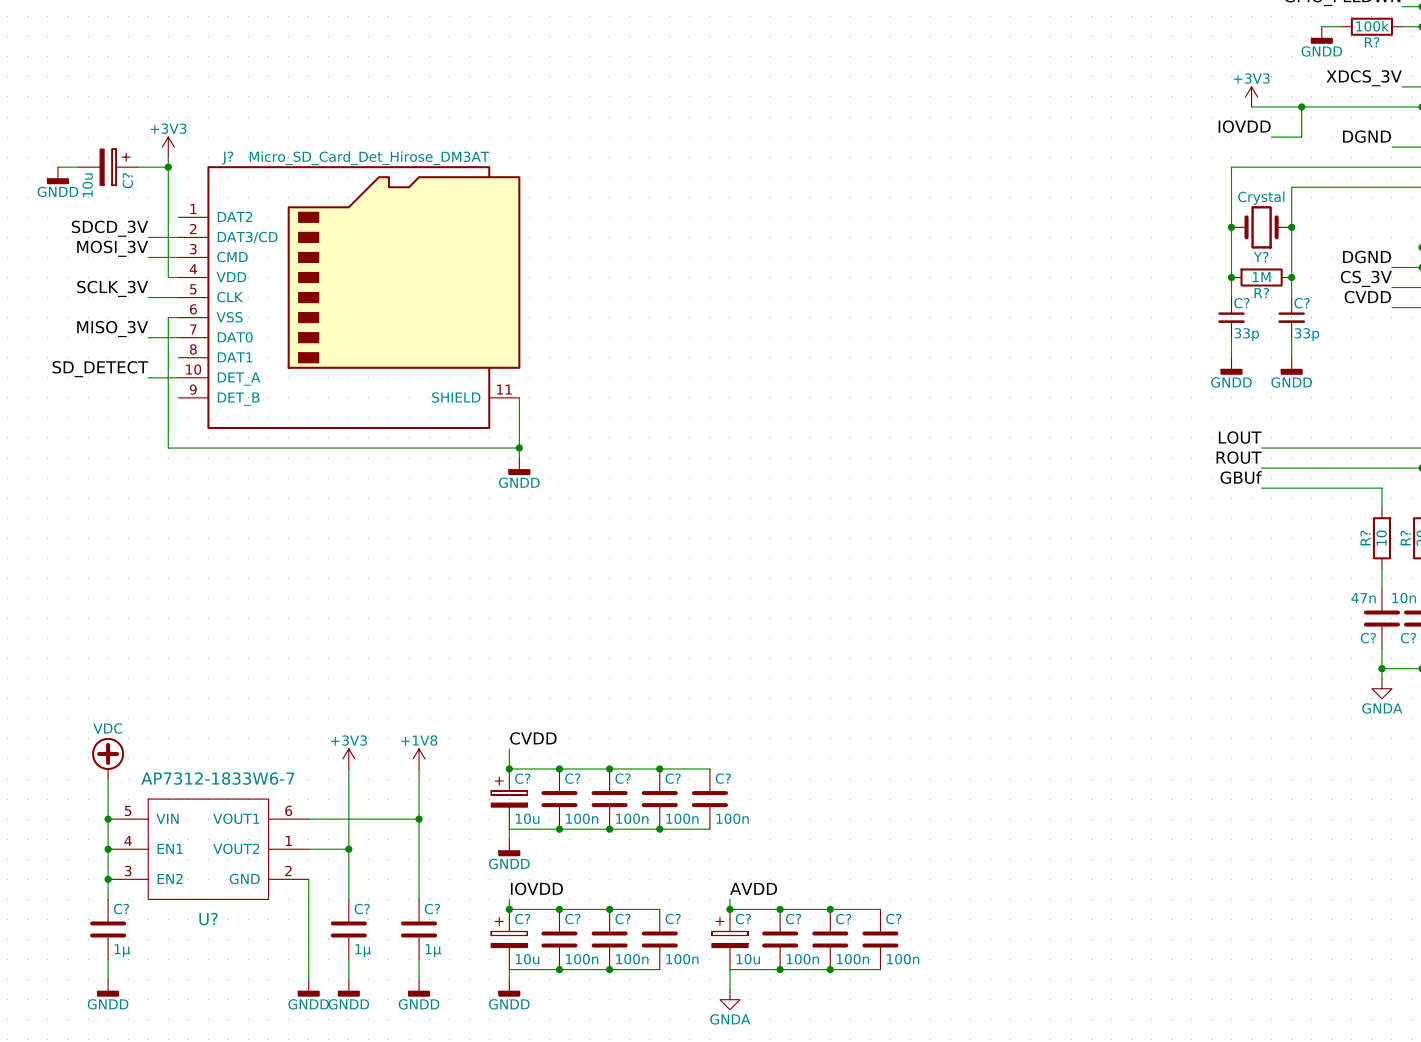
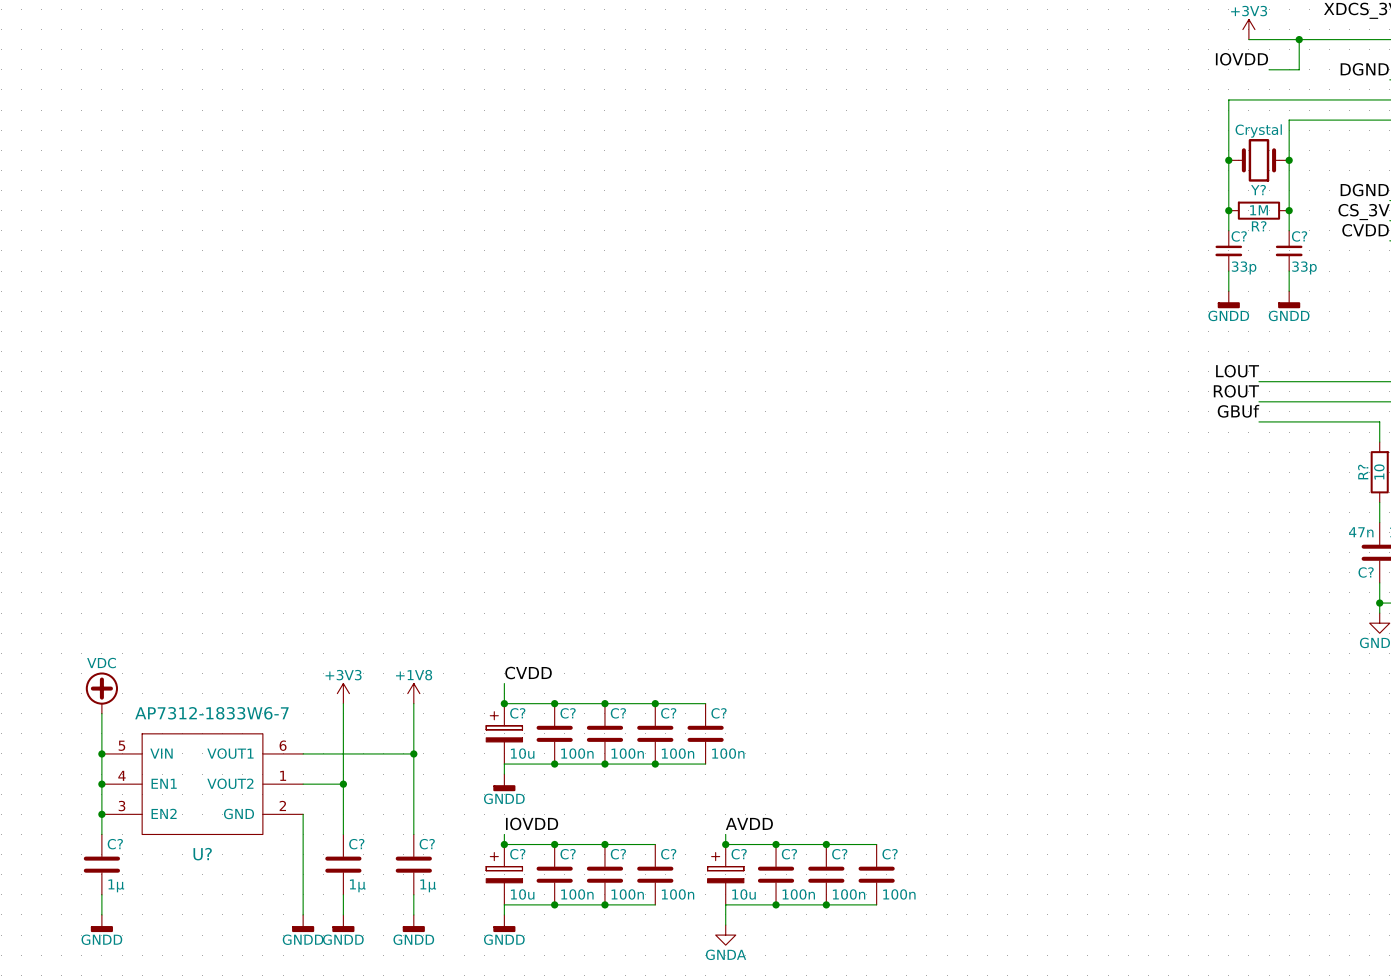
power symbol: +3V3 (168, 147) -> none
wire: (168, 157) (168, 277) (178, 277) -> none
wire: (57, 167) (78, 167) -> none
C?: 10u (108, 167) -> none
wire: (138, 167) (168, 167) -> none
junction: (168, 167) -> none
power symbol: GNDD (57, 175) -> none
label: SDCD_3V (109, 228) -> none
wire: (148, 237) (178, 237) -> none
label: MOSI_3V (112, 248) -> none
wire: (148, 257) (178, 257) -> none
label: SCLK_3V (112, 288) -> none
wire: (148, 297) (178, 297) -> none
J?: Micro_SD_Card_Det_Hirose_DM3AT (349, 297) -> none
wire: (178, 317) (168, 317) (168, 448) (519, 448) -> none
label: MISO_3V (112, 329) -> none
wire: (148, 337) (178, 337) -> none
label: SD_DETECT (100, 369) -> none
wire: (148, 377) (178, 377) -> none
wire: (519, 397) (519, 458) -> none
junction: (519, 448) -> none
power symbol: GNDD (519, 466) -> none

